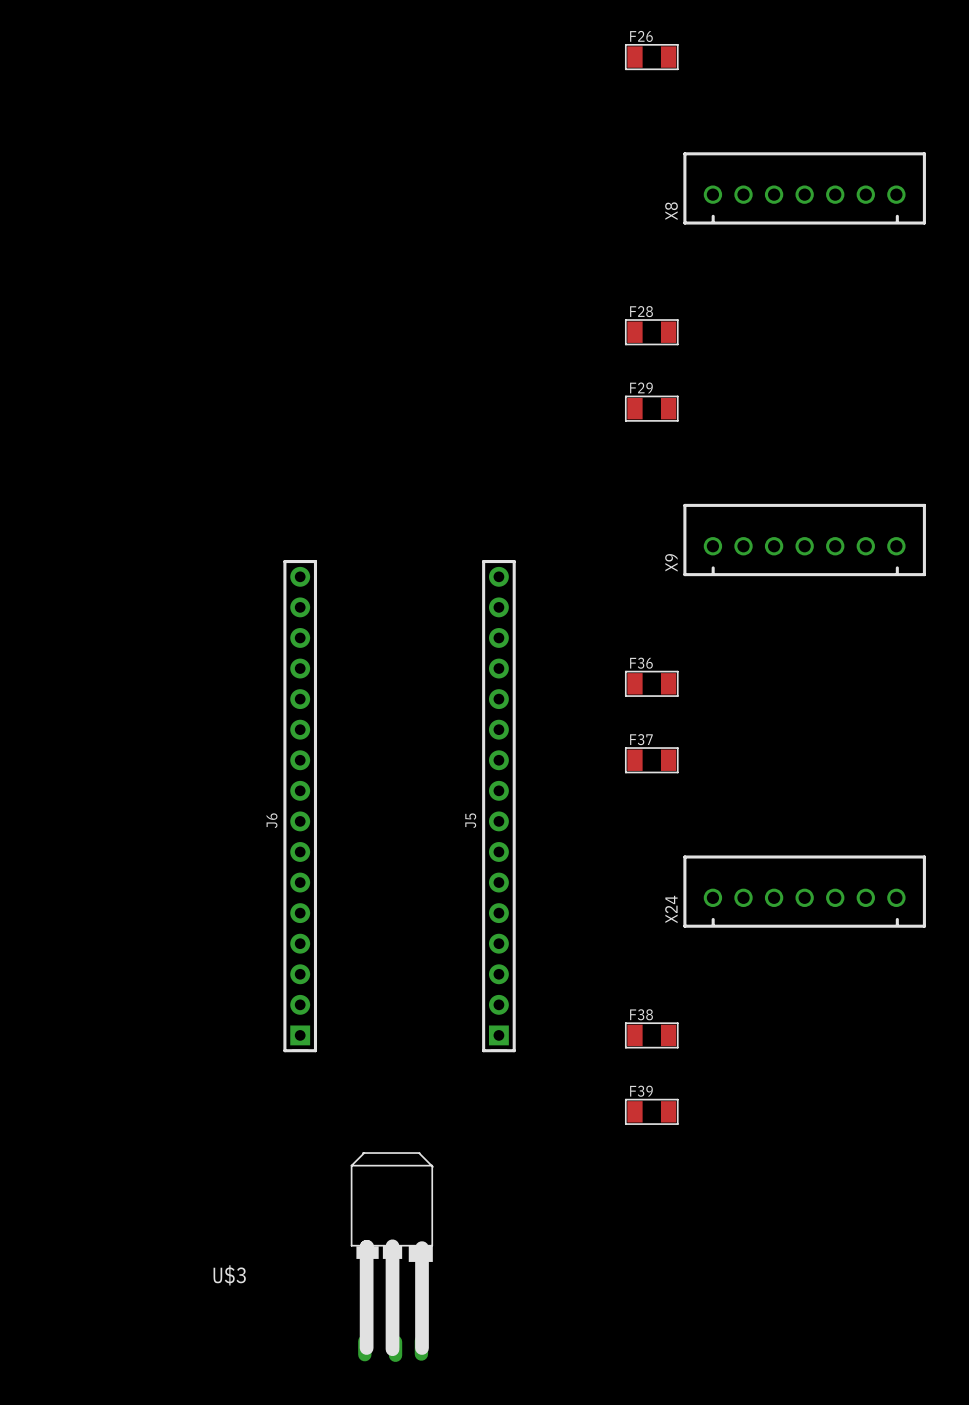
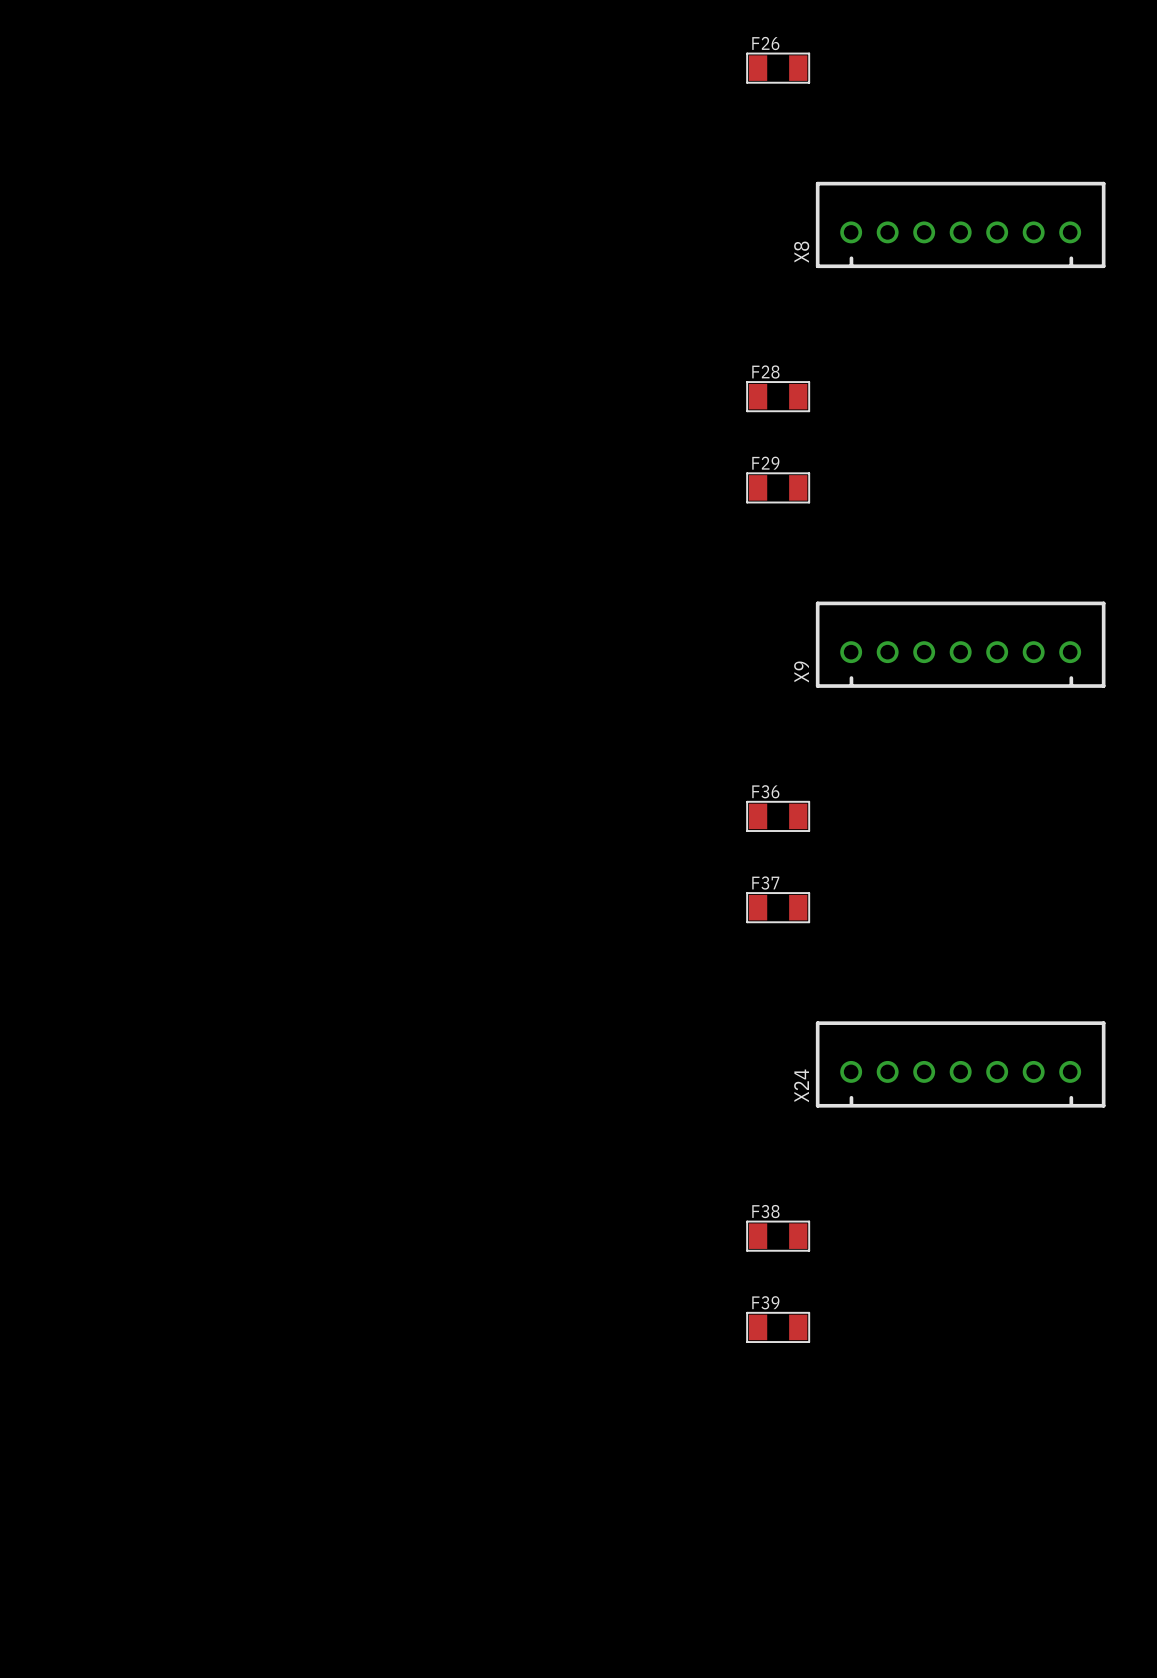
J6: (300, 806) -> none
J5: (498, 806) -> none
U$3: (392, 1257) -> none

